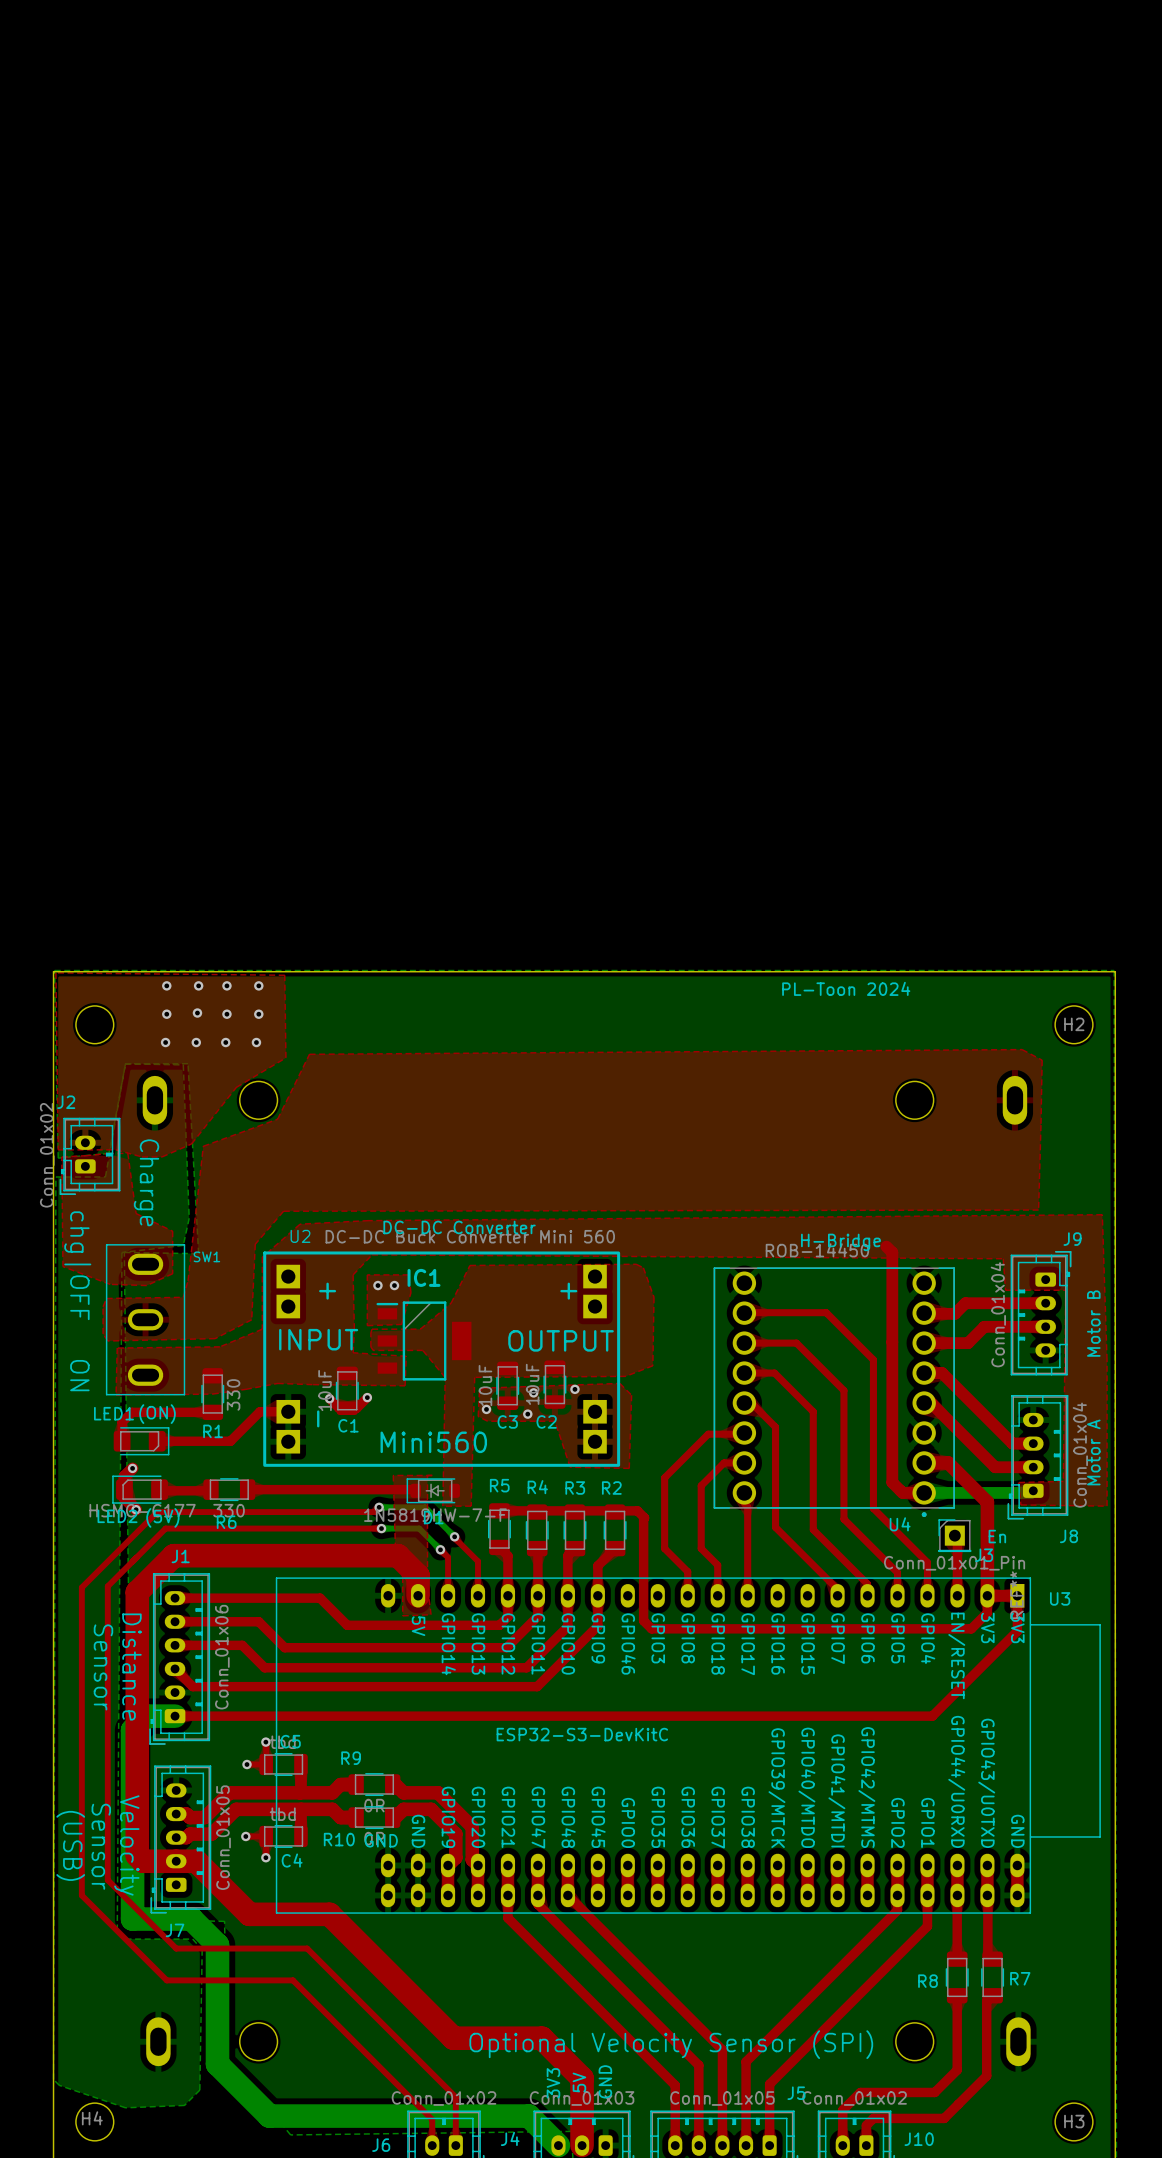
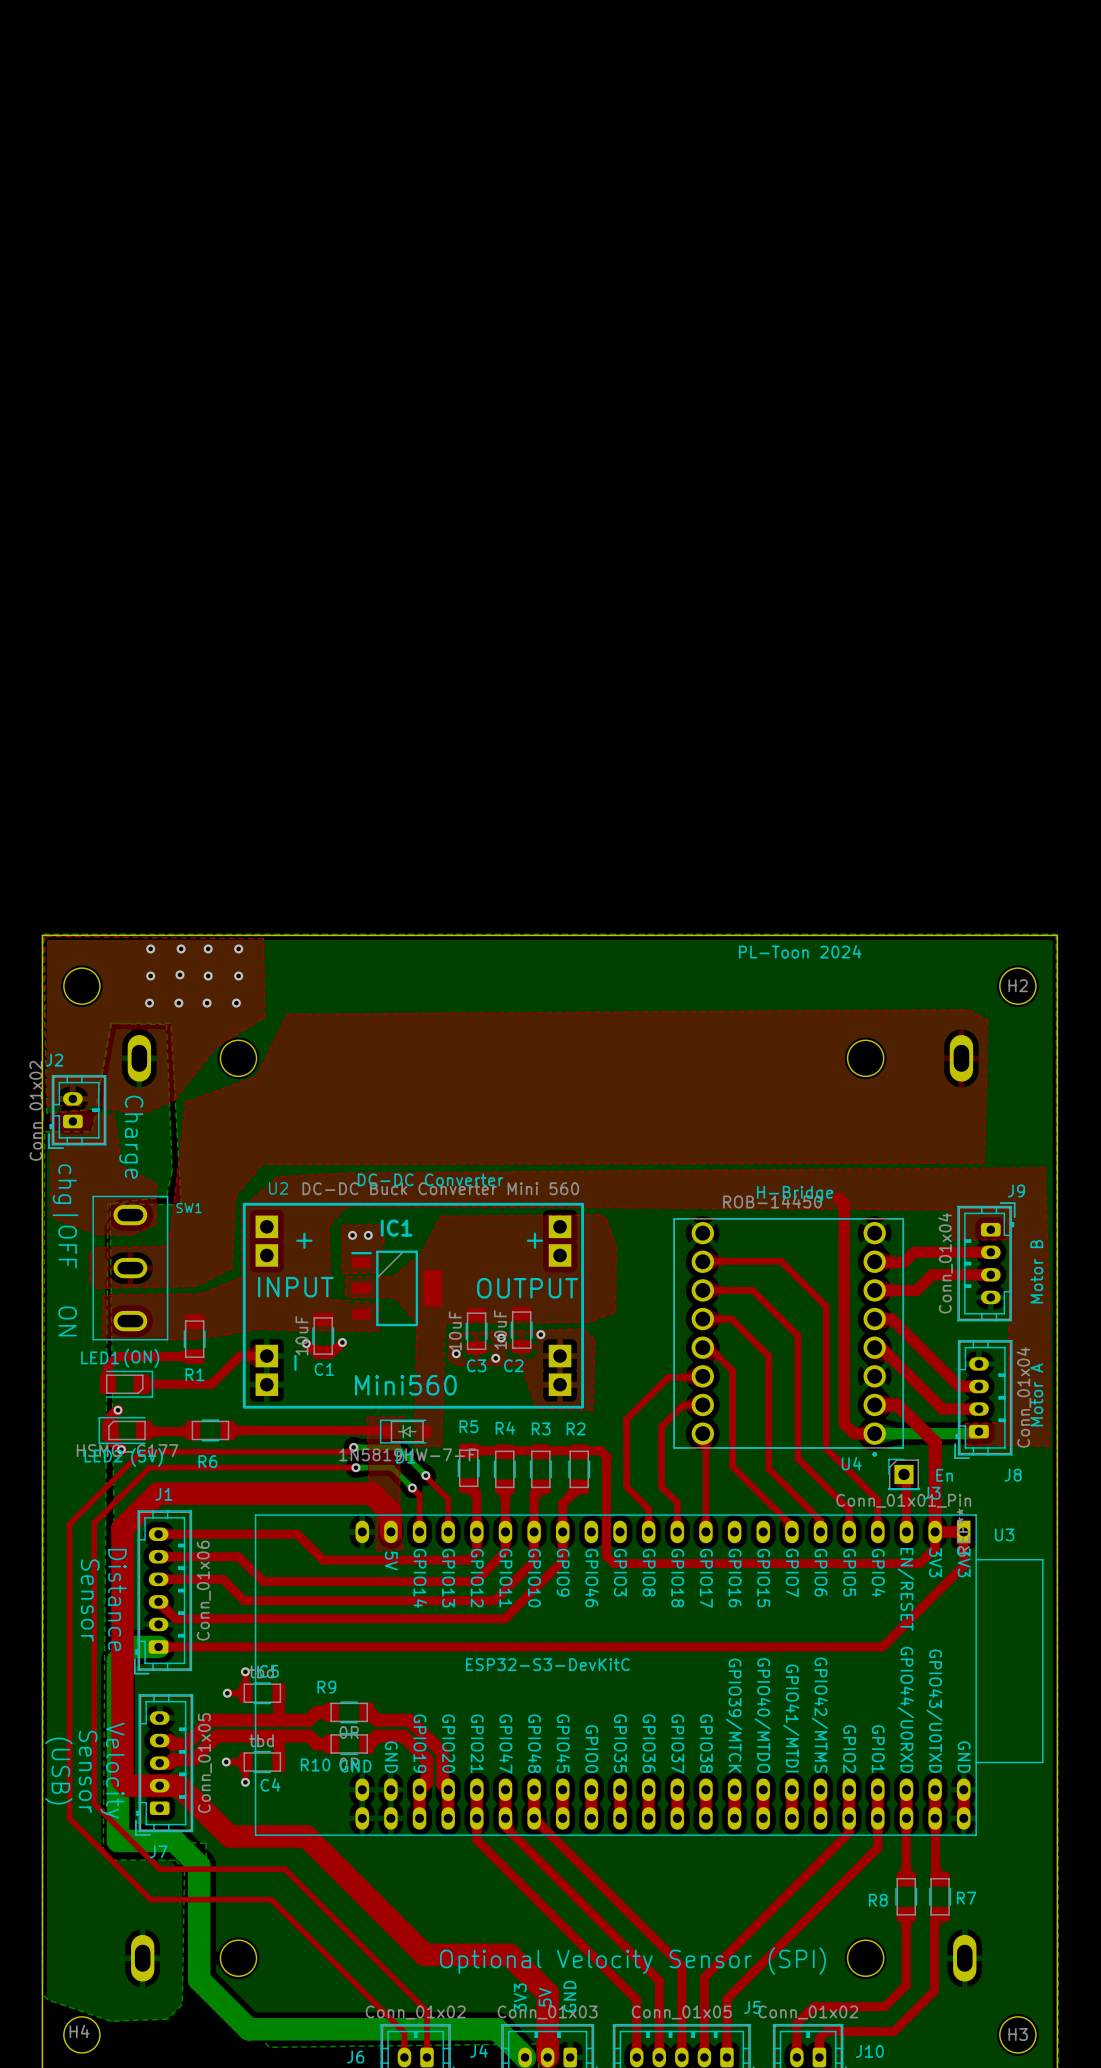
R1 value: 330 (233, 1394) -> none
R6 value: 330 (229, 1510) -> none

